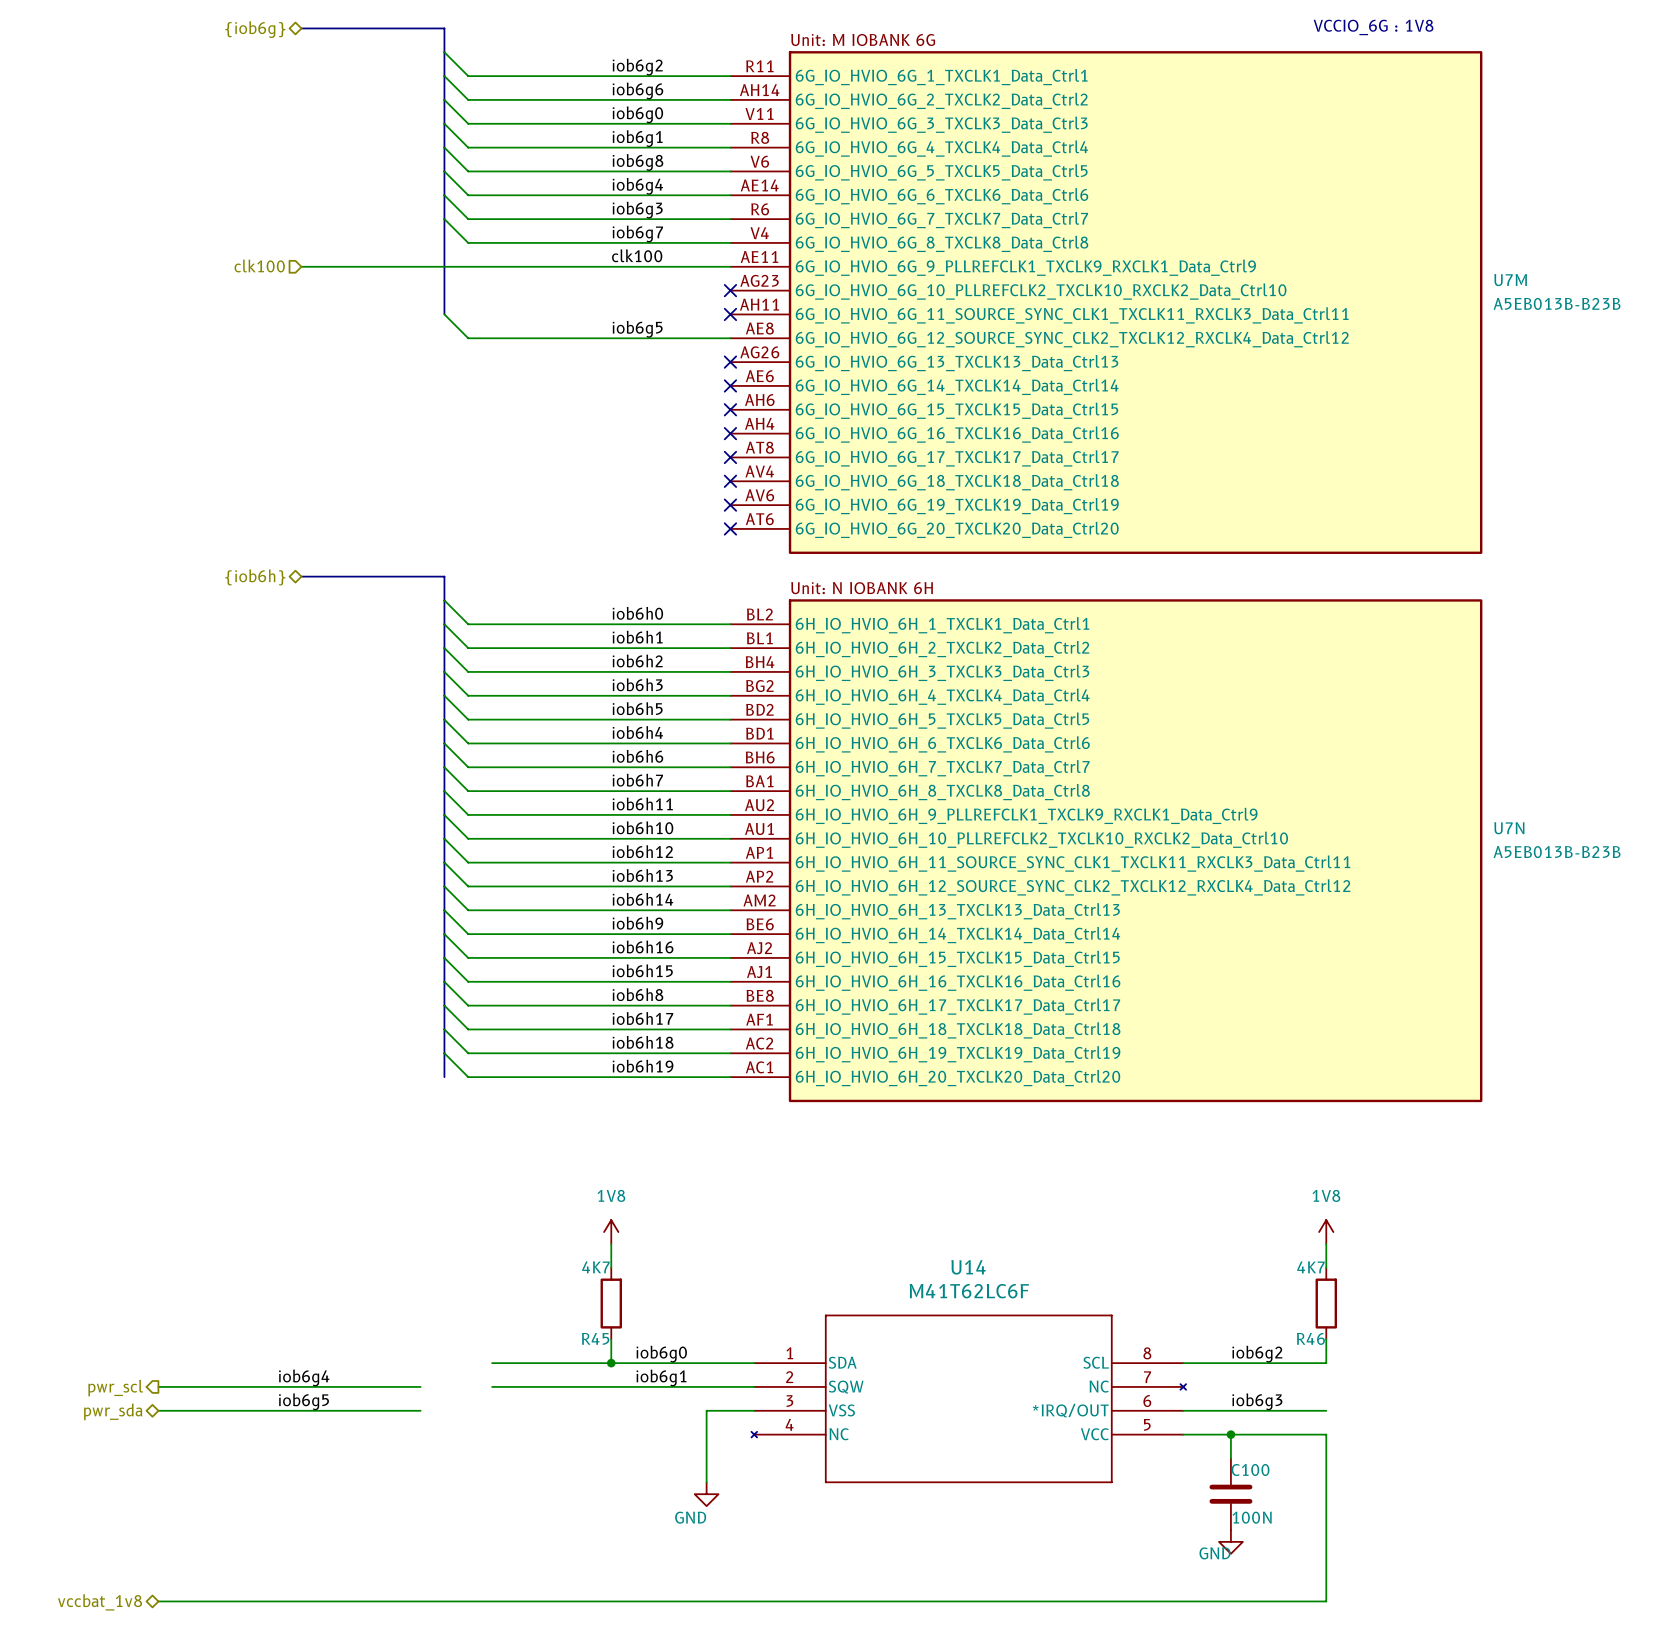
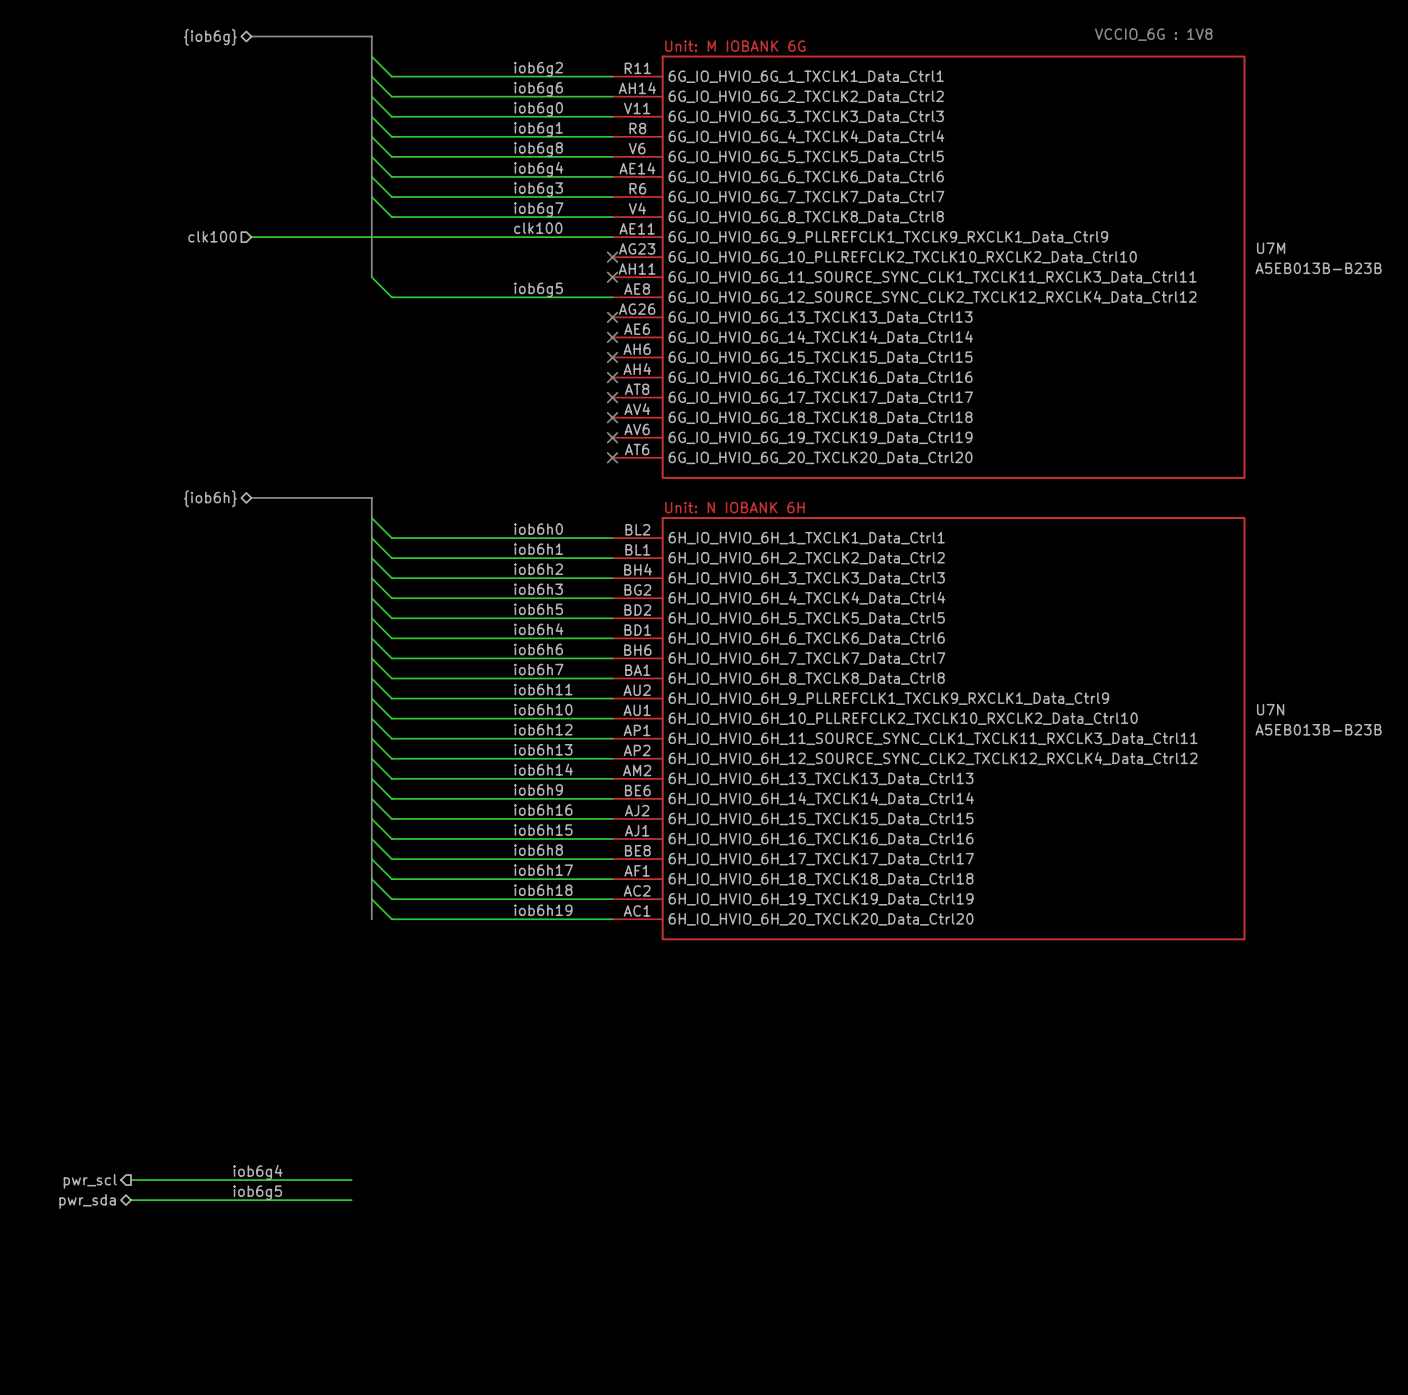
power symbol: 1V8 (611, 1232) -> none
power symbol: 1V8 (1326, 1232) -> none
wire: (611, 1243) (611, 1267) -> none
wire: (1326, 1243) (1326, 1267) -> none
R45: 4K7 (611, 1303) -> none
R46: 4K7 (1326, 1303) -> none
wire: (611, 1339) (611, 1363) -> none
wire: (1326, 1339) (1326, 1363) (1183, 1363) -> none
label: iob6g0 (661, 1354) -> none
label: iob6g2 (1257, 1354) -> none
wire: (492, 1363) (754, 1363) -> none
junction: (611, 1363) -> none
label: iob6g1 (661, 1377) -> none
wire: (492, 1386) (754, 1386) -> none
U14: M41T62LC6F (968, 1398) -> none
label: iob6g3 (1257, 1401) -> none
wire: (754, 1410) (706, 1410) (706, 1482) -> none
wire: (1183, 1410) (1326, 1410) -> none
wire: (1183, 1434) (1326, 1434) (1326, 1601) (158, 1601) -> none
wire: (1230, 1434) (1230, 1458) -> none
junction: (1230, 1434) -> none
power symbol: GND (706, 1494) -> none
C100: 100N (1230, 1494) -> none
power symbol: GND (1230, 1541) -> none
hierarchical label: vccbat_1v8 (100, 1602) -> none

